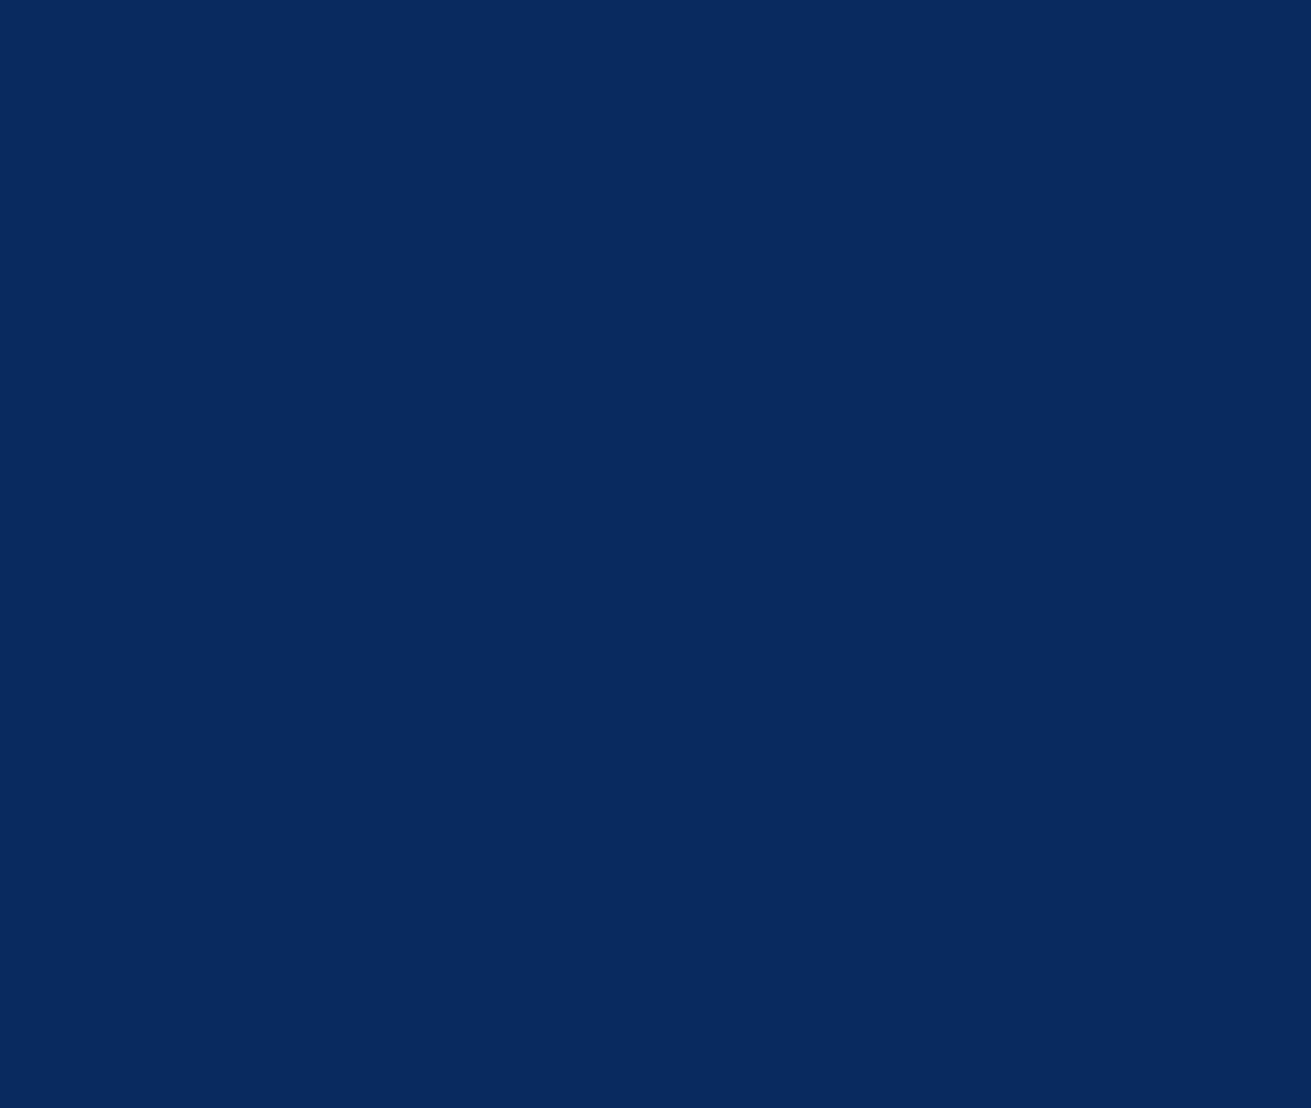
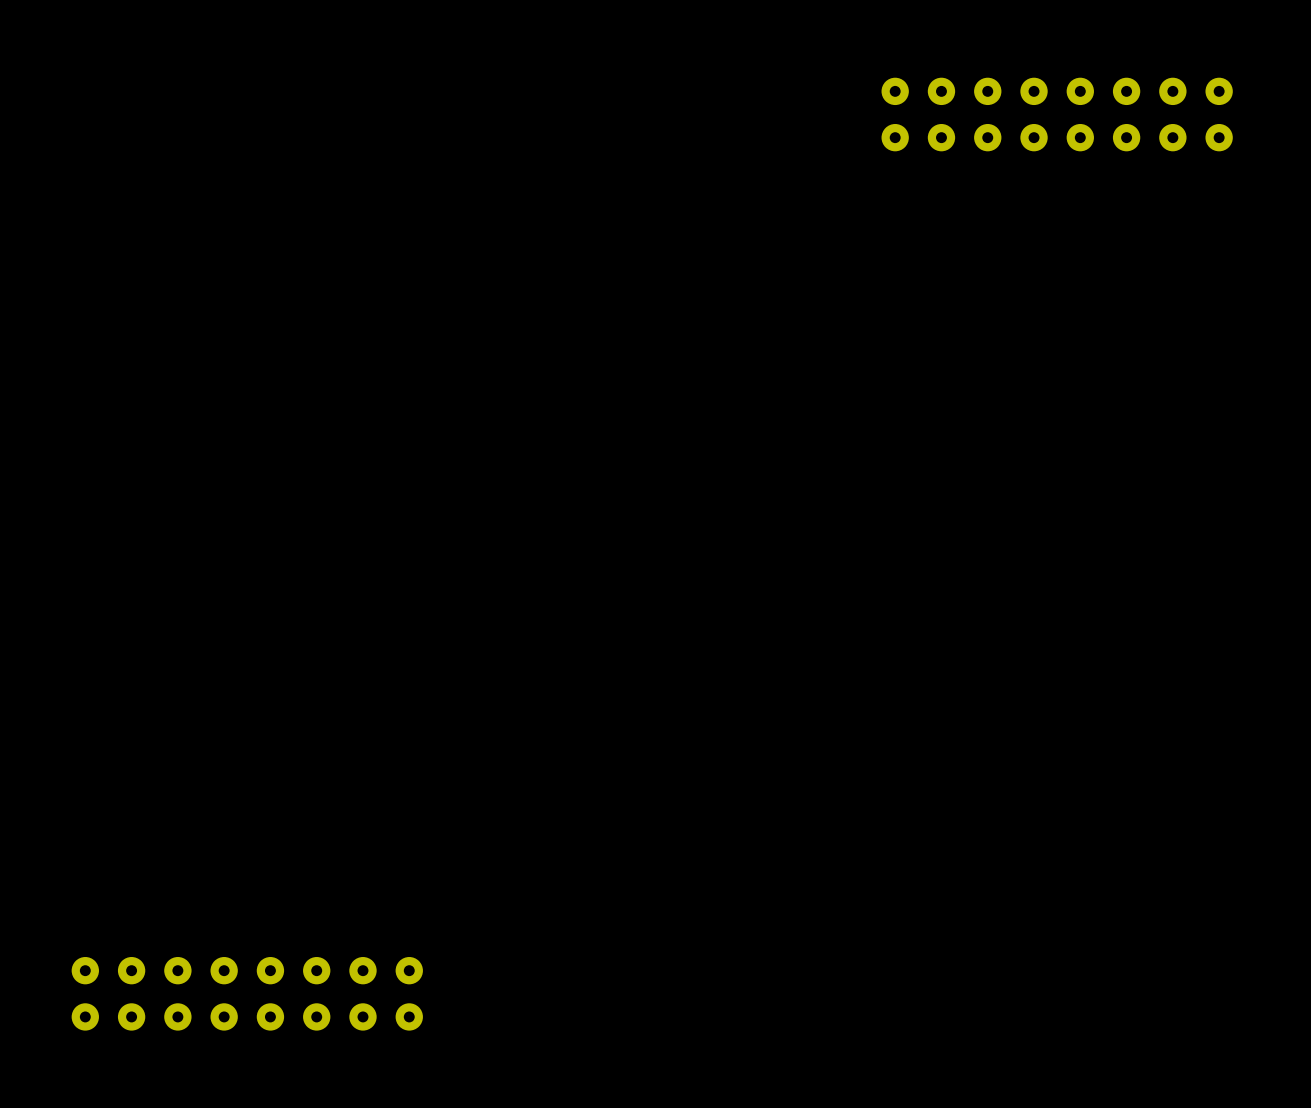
part: none -> (1057, 114)
part: none -> (247, 993)

